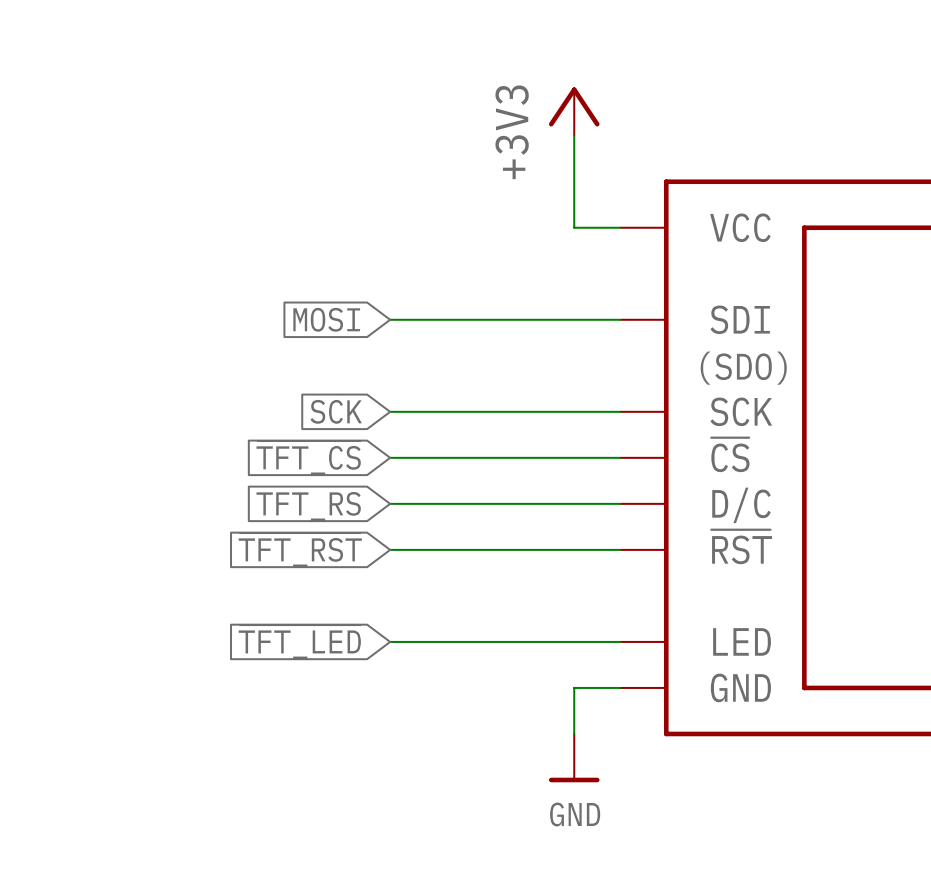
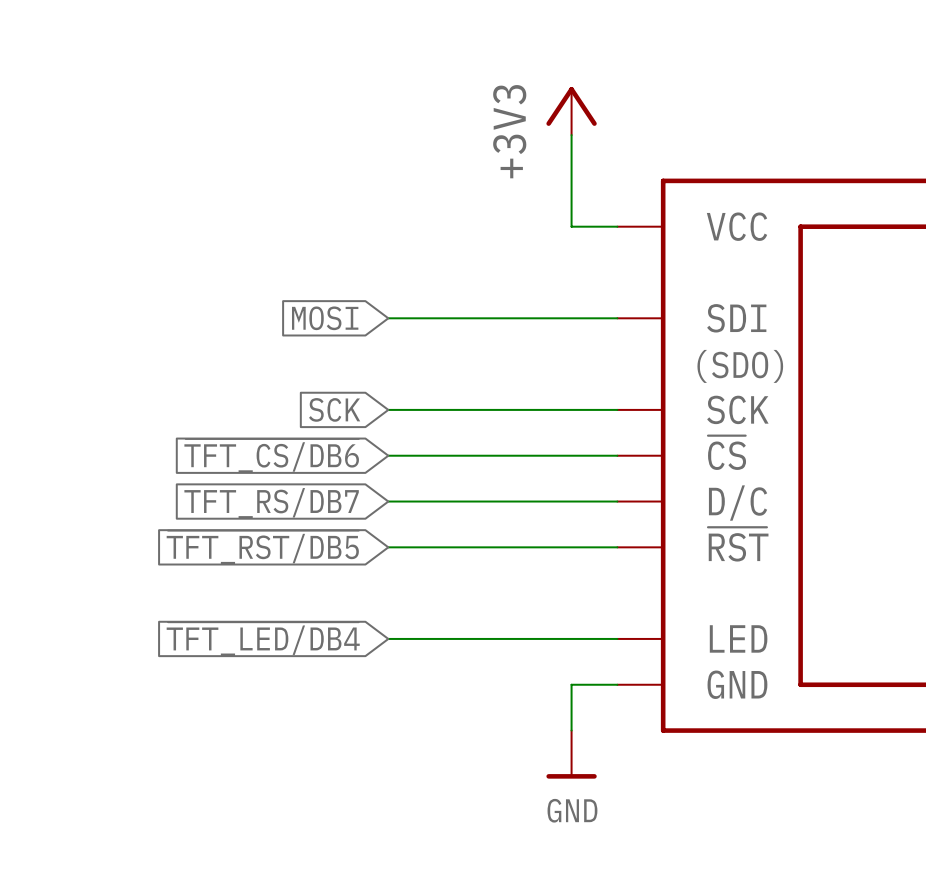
global label: ~{TFT_CS} (308, 457) -> ~{TFT_CS/DB6} (271, 455)
global label: TFT_RS (308, 506) -> TFT_RS/DB7 (271, 503)
global label: ~{TFT_RST} (300, 550) -> ~{TFT_RST/DB5} (262, 547)
global label: ~{TFT_LED} (299, 642) -> ~{TFT_LED/DB4} (263, 639)

